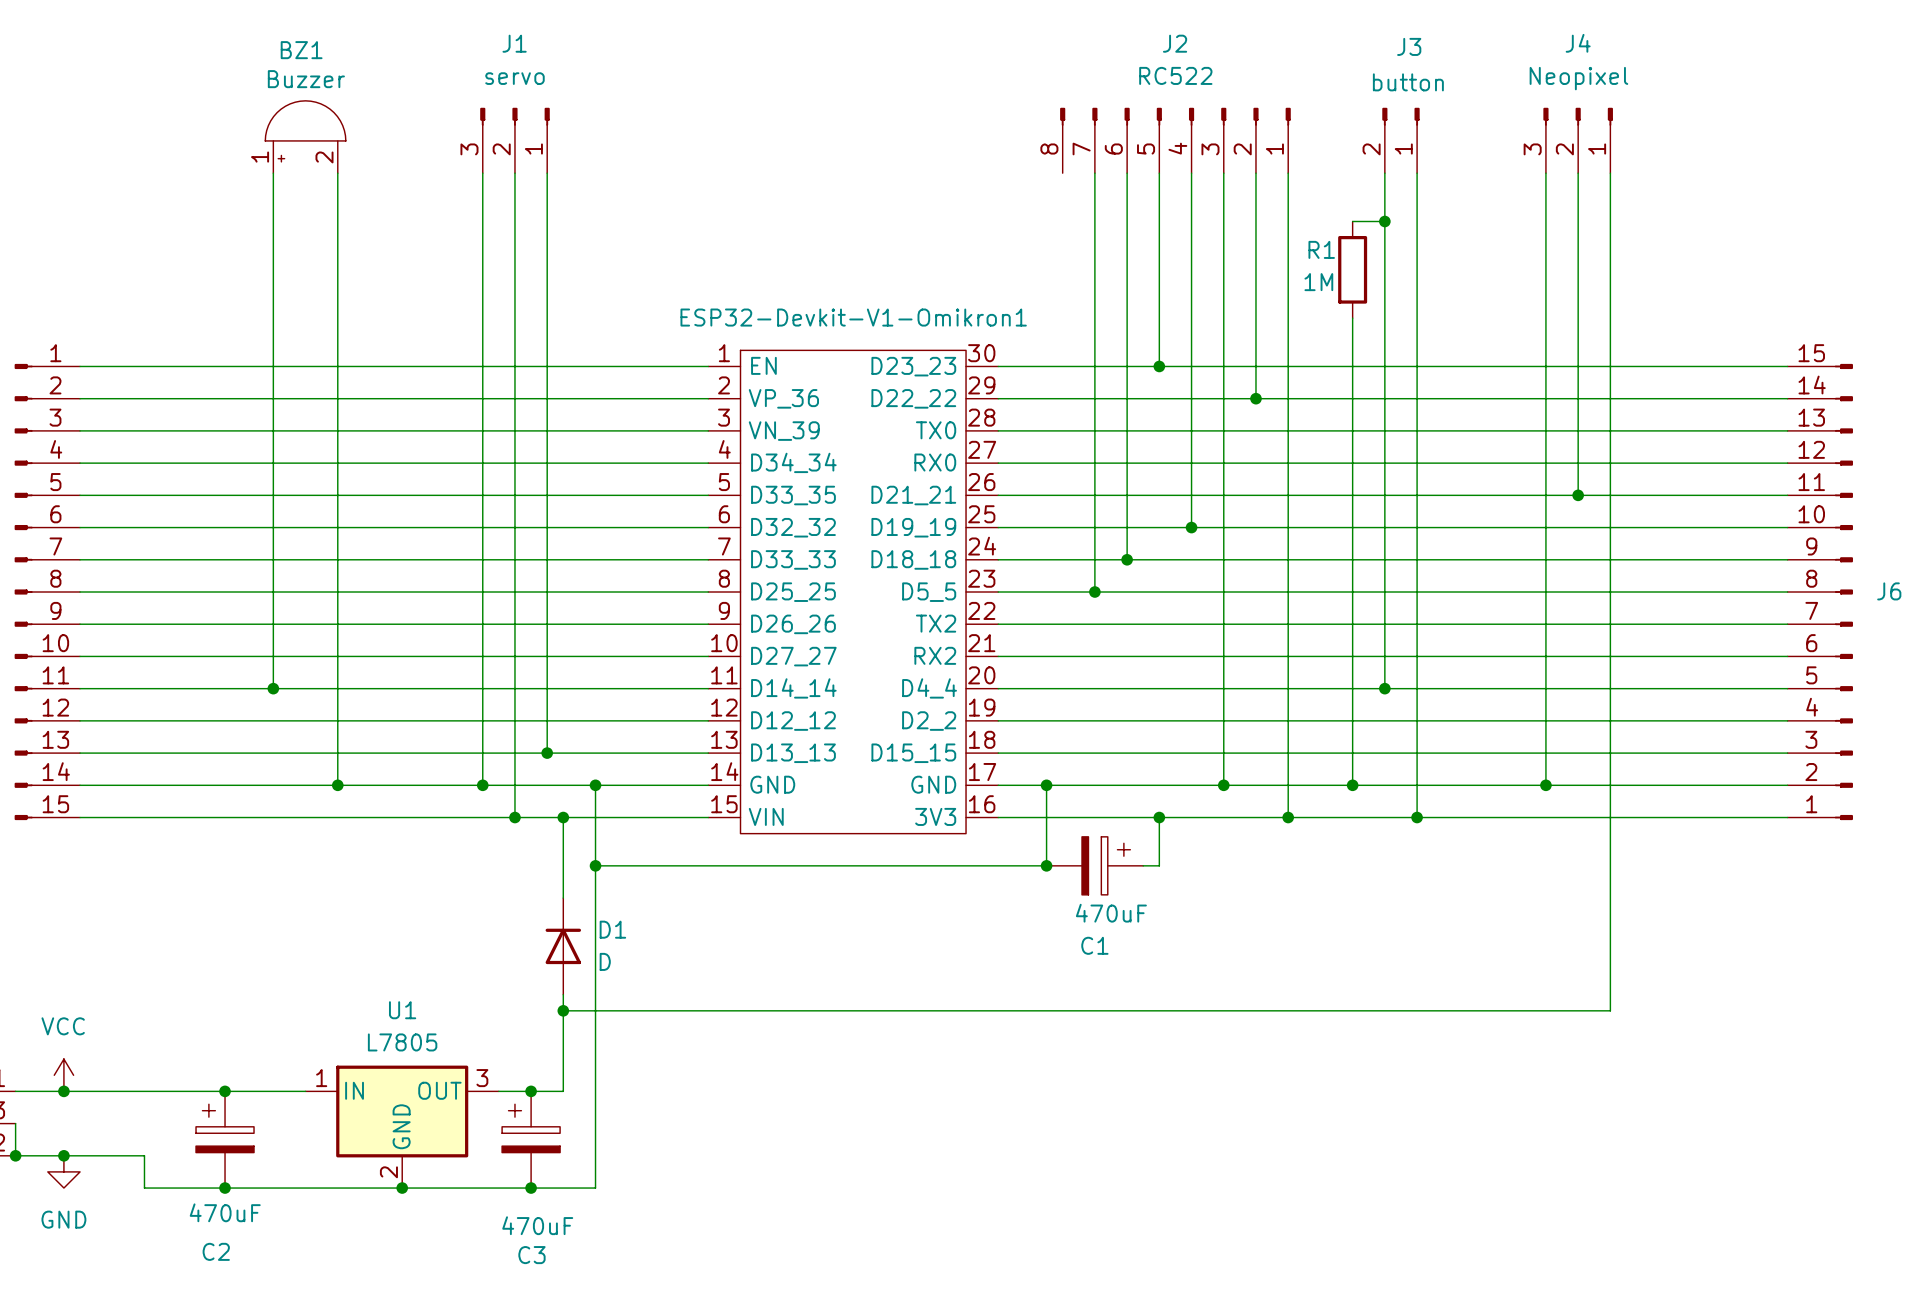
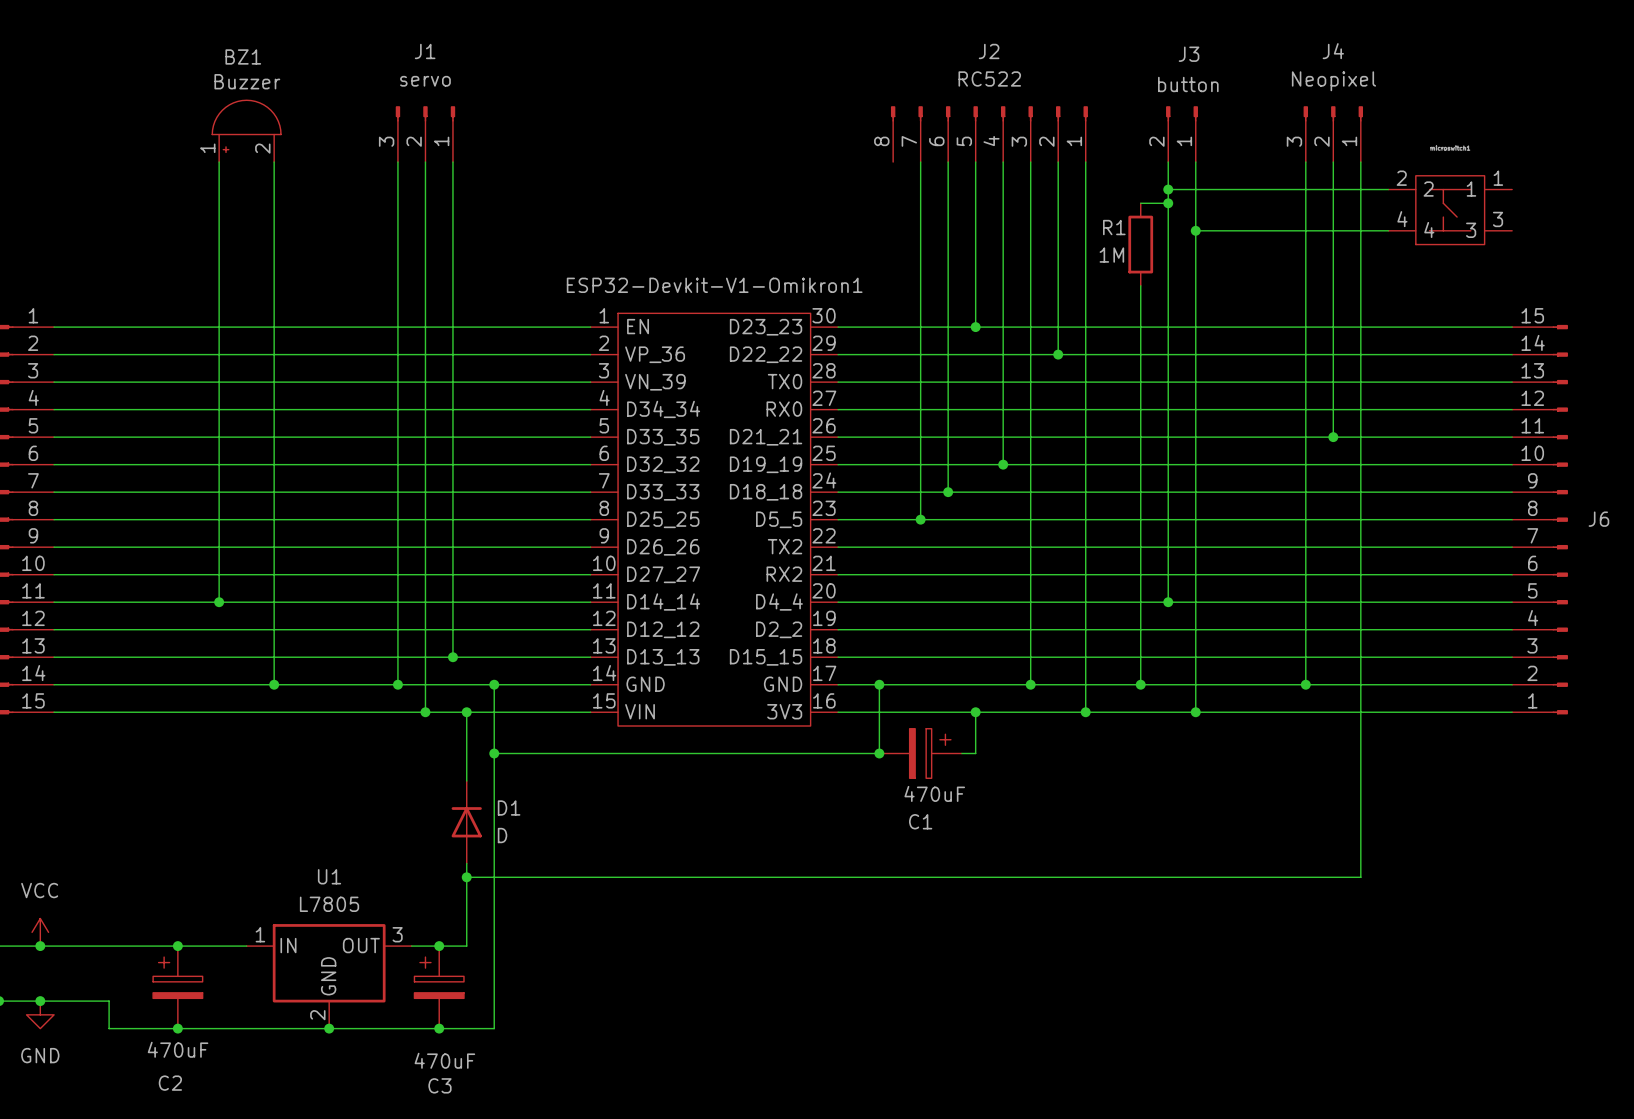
wire: none -> (1168, 189) (1388, 189)
junction: none -> (1168, 189)
part: none -> (1450, 210)
wire: none -> (1195, 230) (1388, 230)
junction: none -> (1195, 230)

